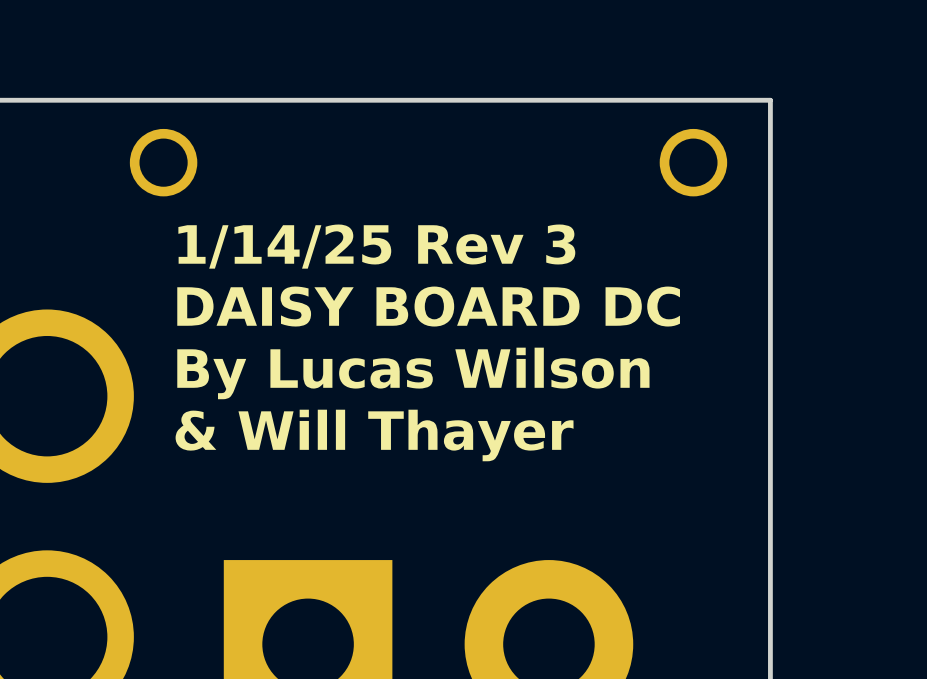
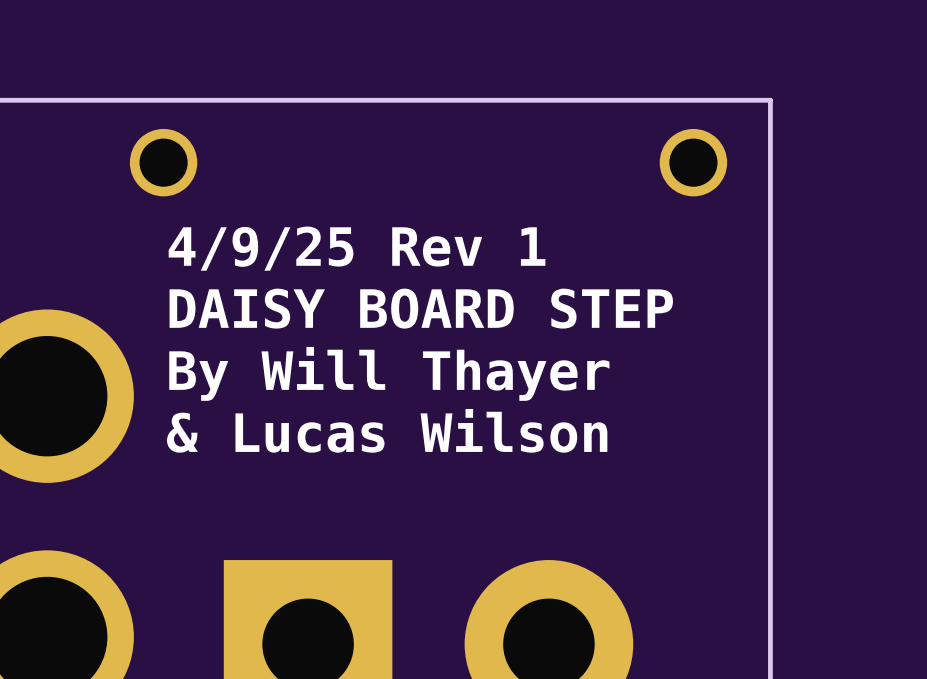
text: 1/14/25 Rev 3 (376, 246) -> 4/9/25 Rev 1 (357, 248)
text: DAISY BOARD DC (428, 306) -> DAISY BOARD STEP (421, 308)
text: By Lucas Wilson (413, 373) -> By Will Thayer (389, 373)
text: & Will Thayer (374, 435) -> & Lucas Wilson (387, 430)

